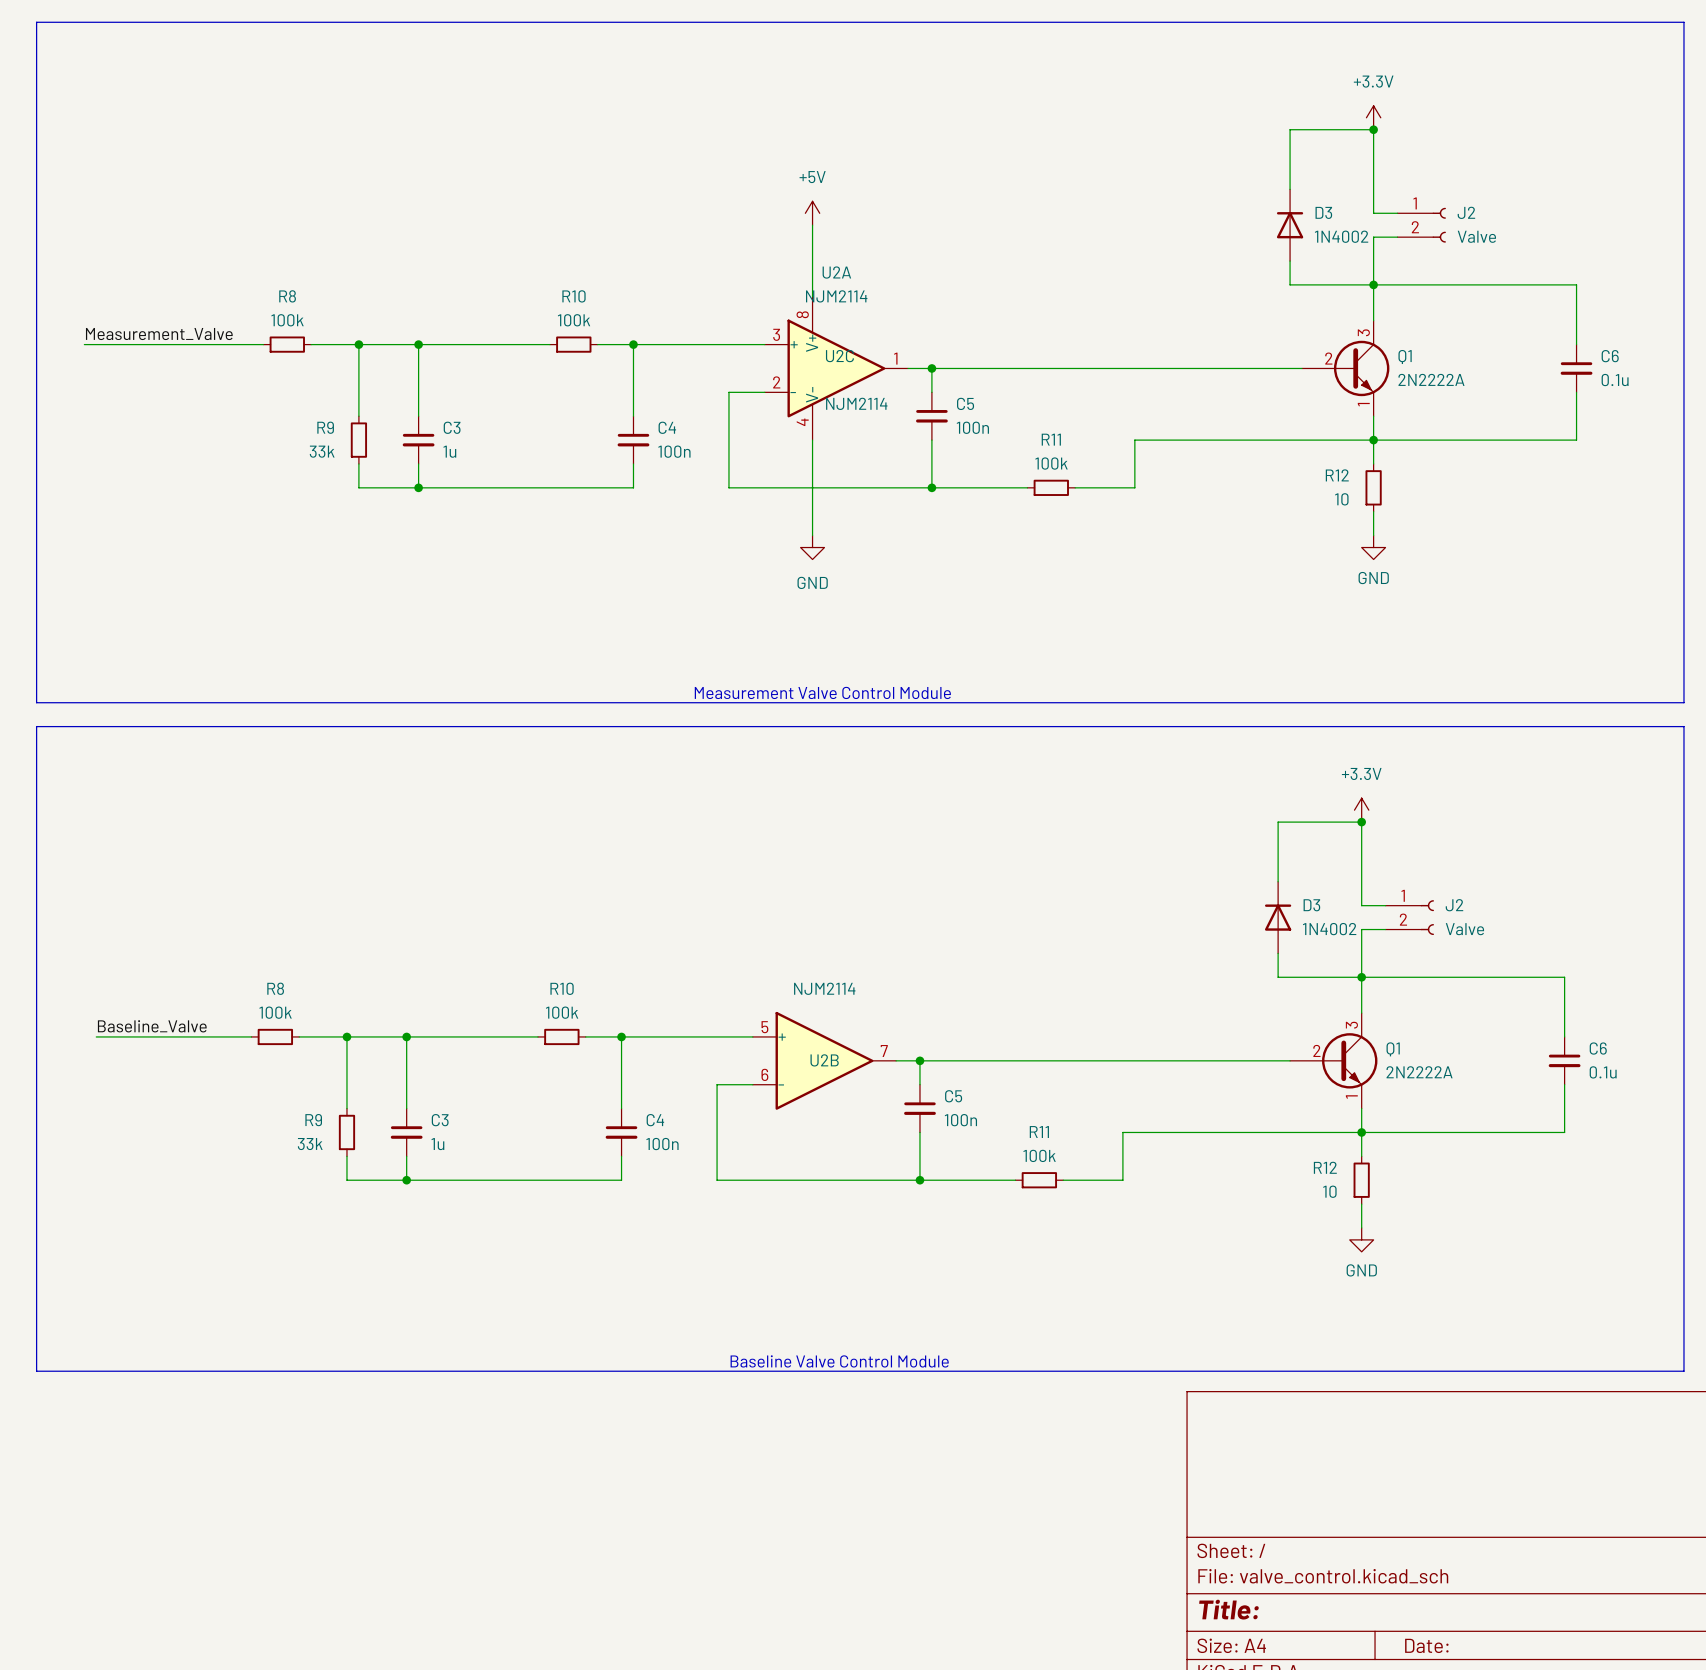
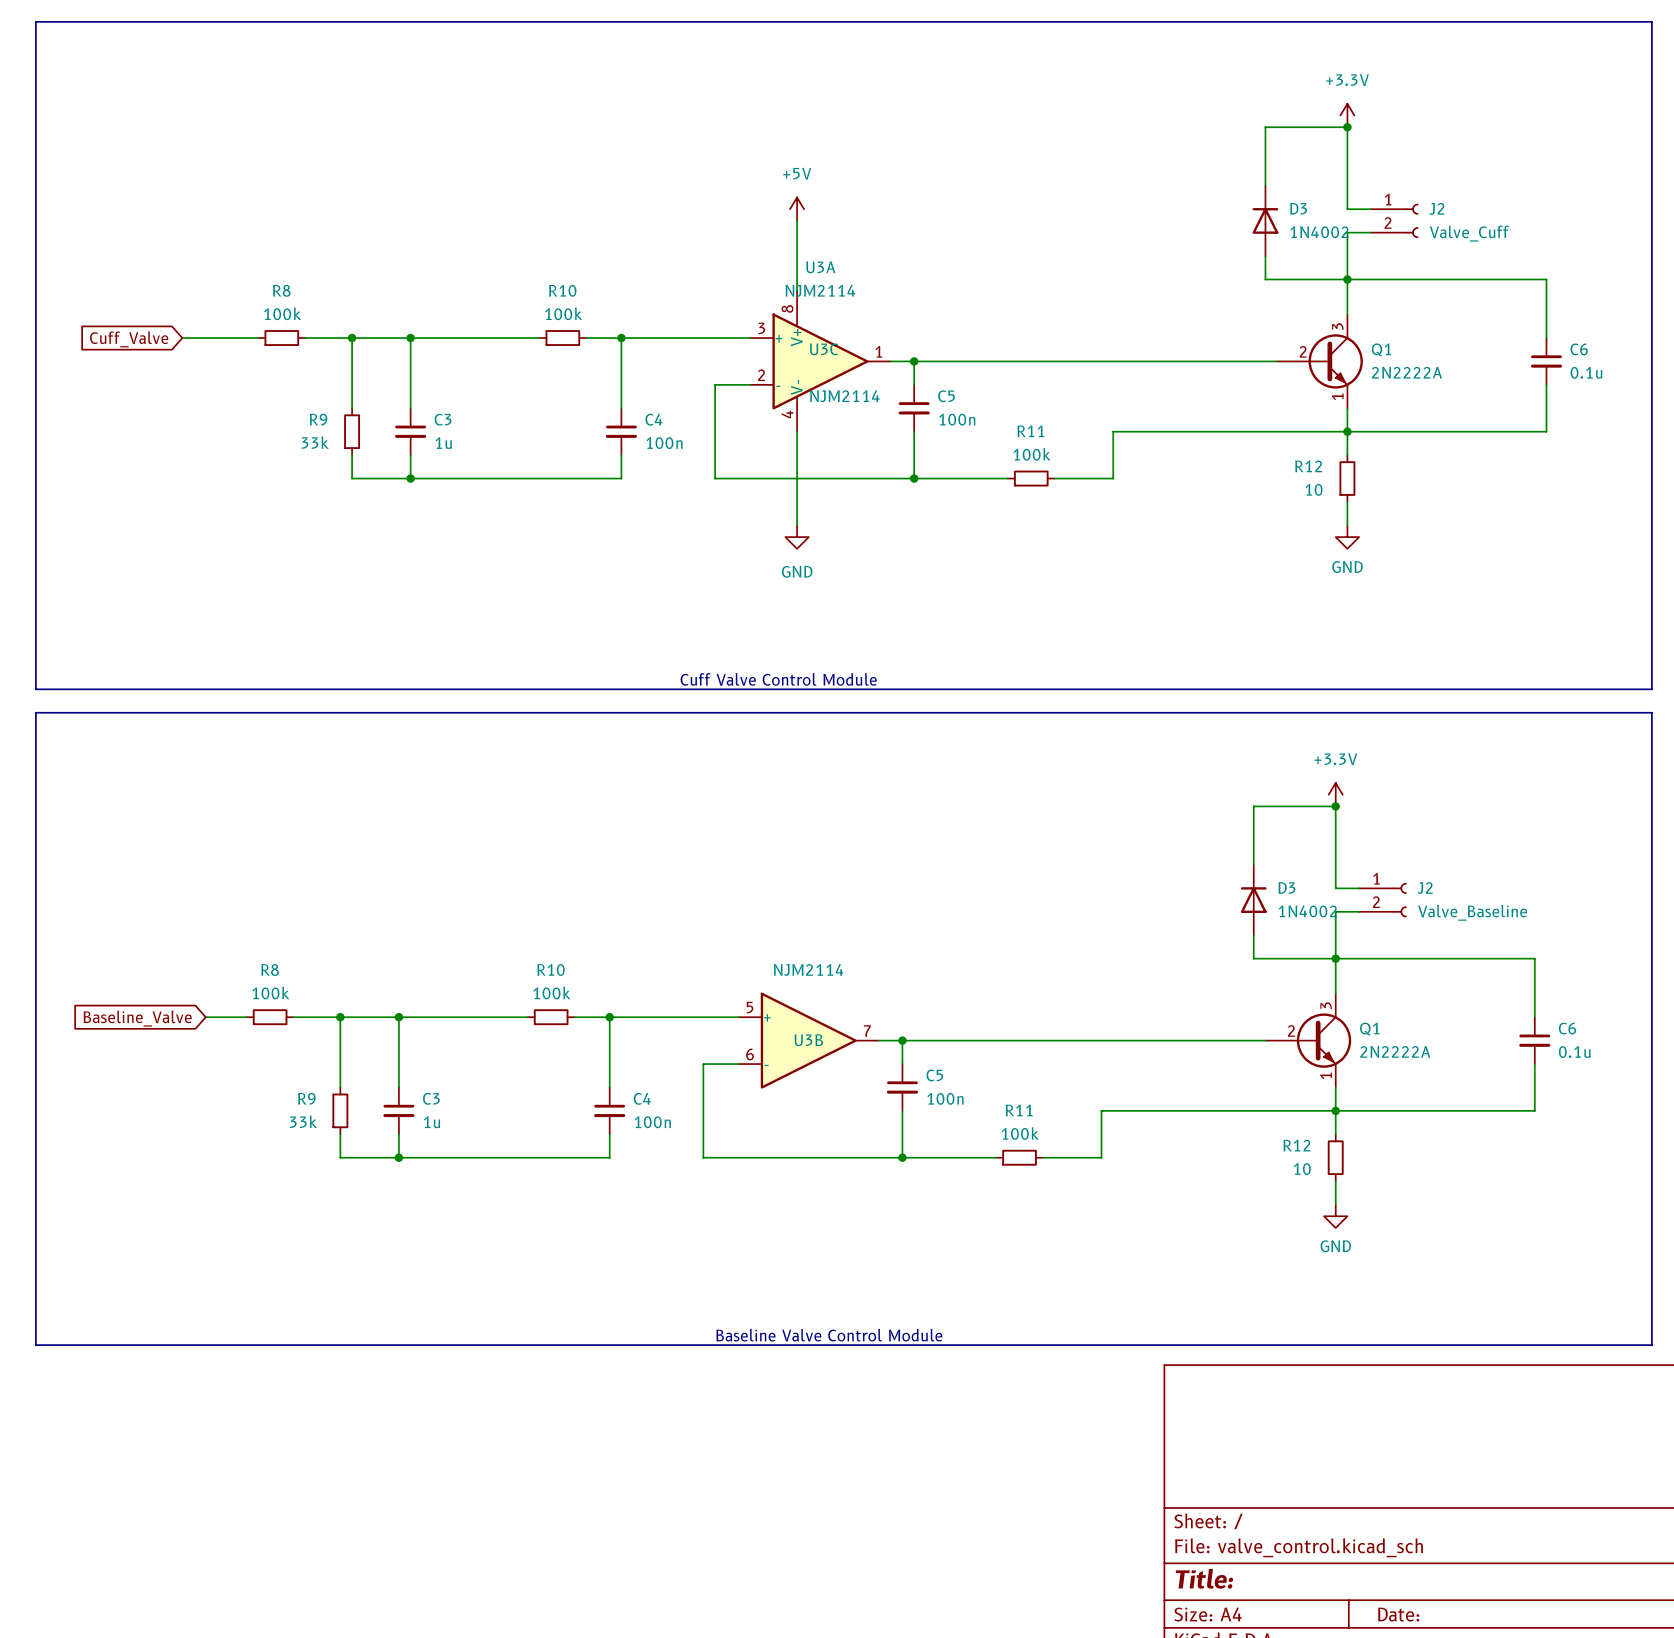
J2 value: Valve (1476, 236) -> Valve_Cuff (1469, 233)
U2A name: U2A (836, 272) -> U3A (820, 267)
label: Measurement_Valve (159, 334) -> none
wire: (84, 344) (185, 344) -> none
global label: none -> Cuff_Valve (129, 339)
U2C name: U2C (839, 356) -> U3C (824, 349)
text: Measurement Valve Control Module (822, 692) -> Cuff Valve Control Module (778, 679)
J2 value: Valve (1464, 929) -> Valve_Baseline (1472, 912)
label: Baseline_Valve (152, 1026) -> none
wire: (96, 1036) (209, 1036) -> none
global label: none -> Baseline_Valve (137, 1018)
U2B name: U2B (824, 1060) -> U3B (808, 1040)

